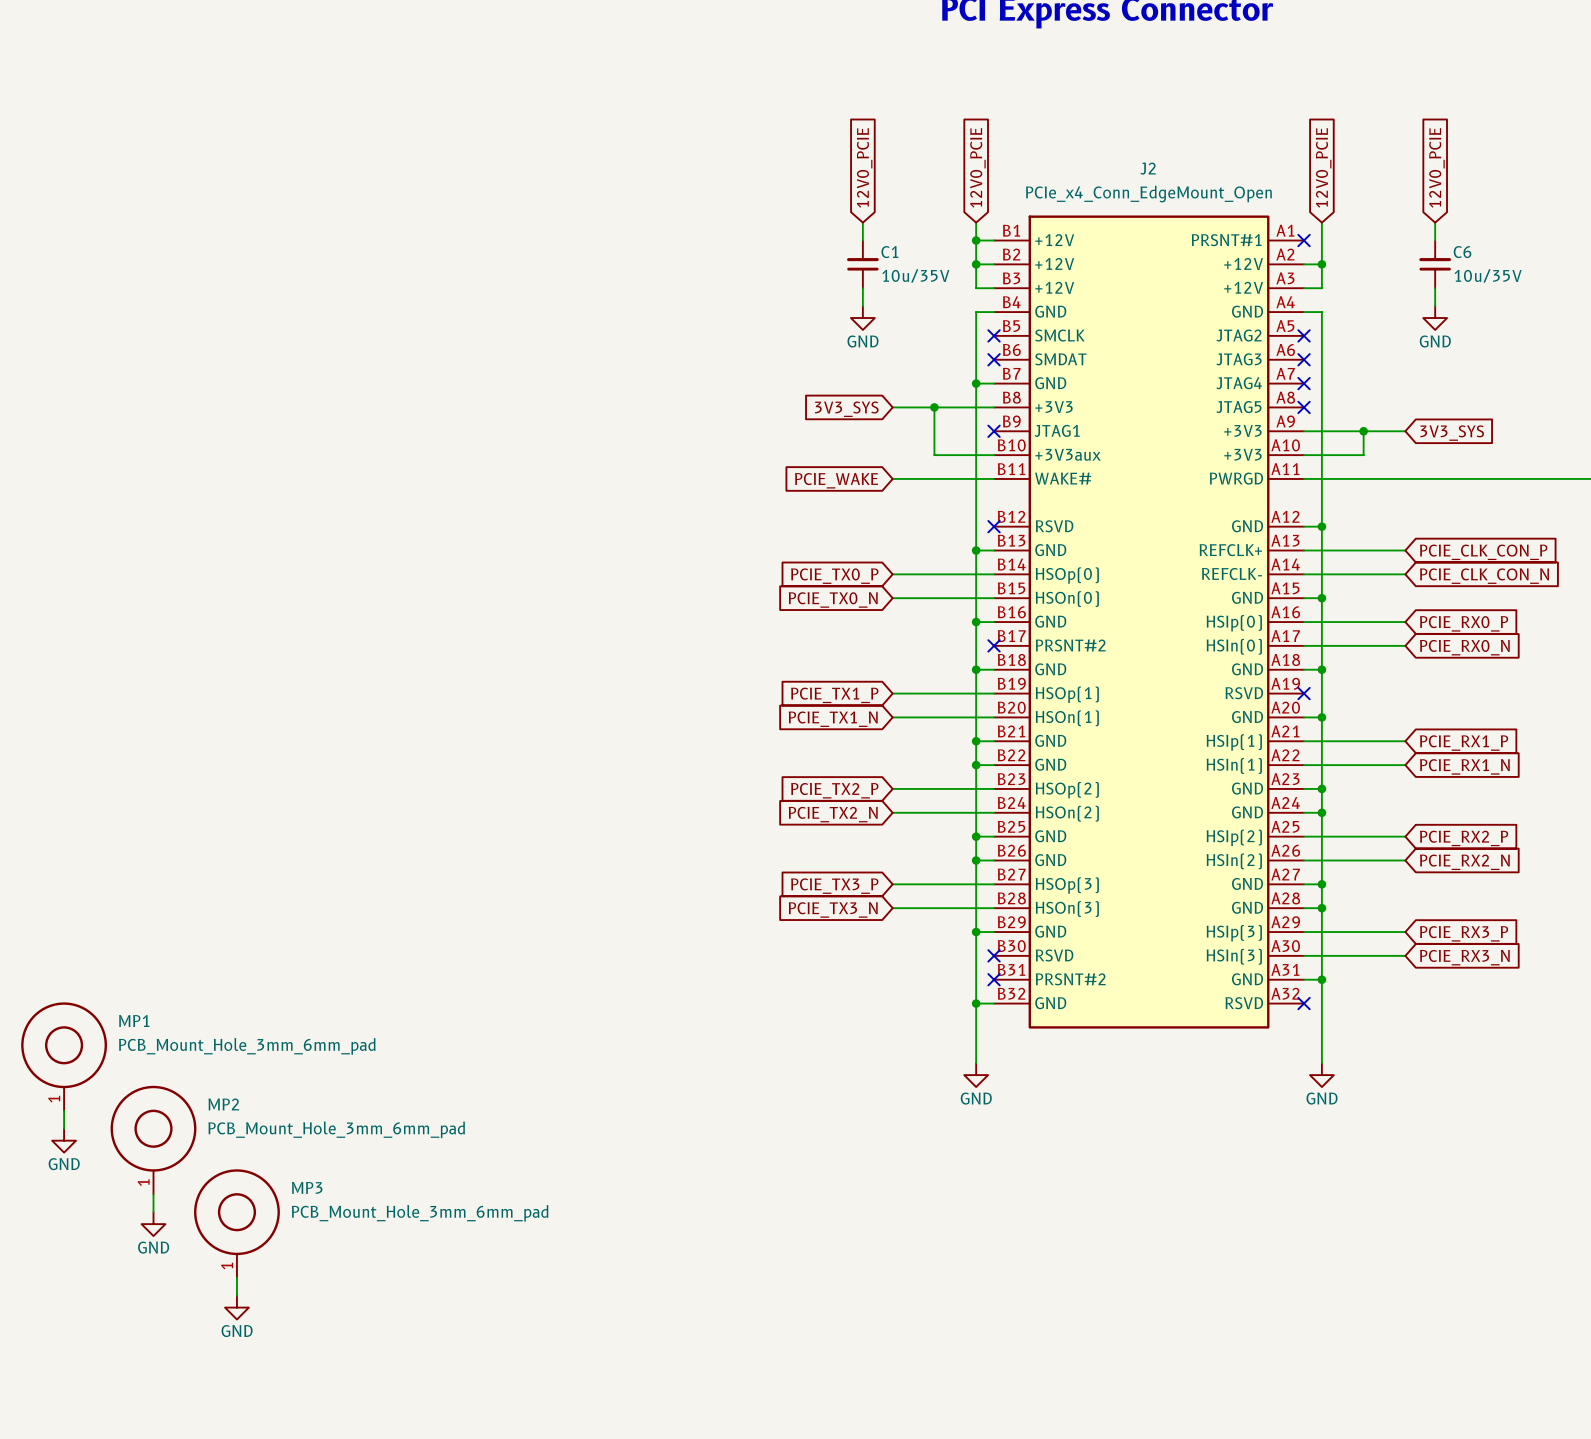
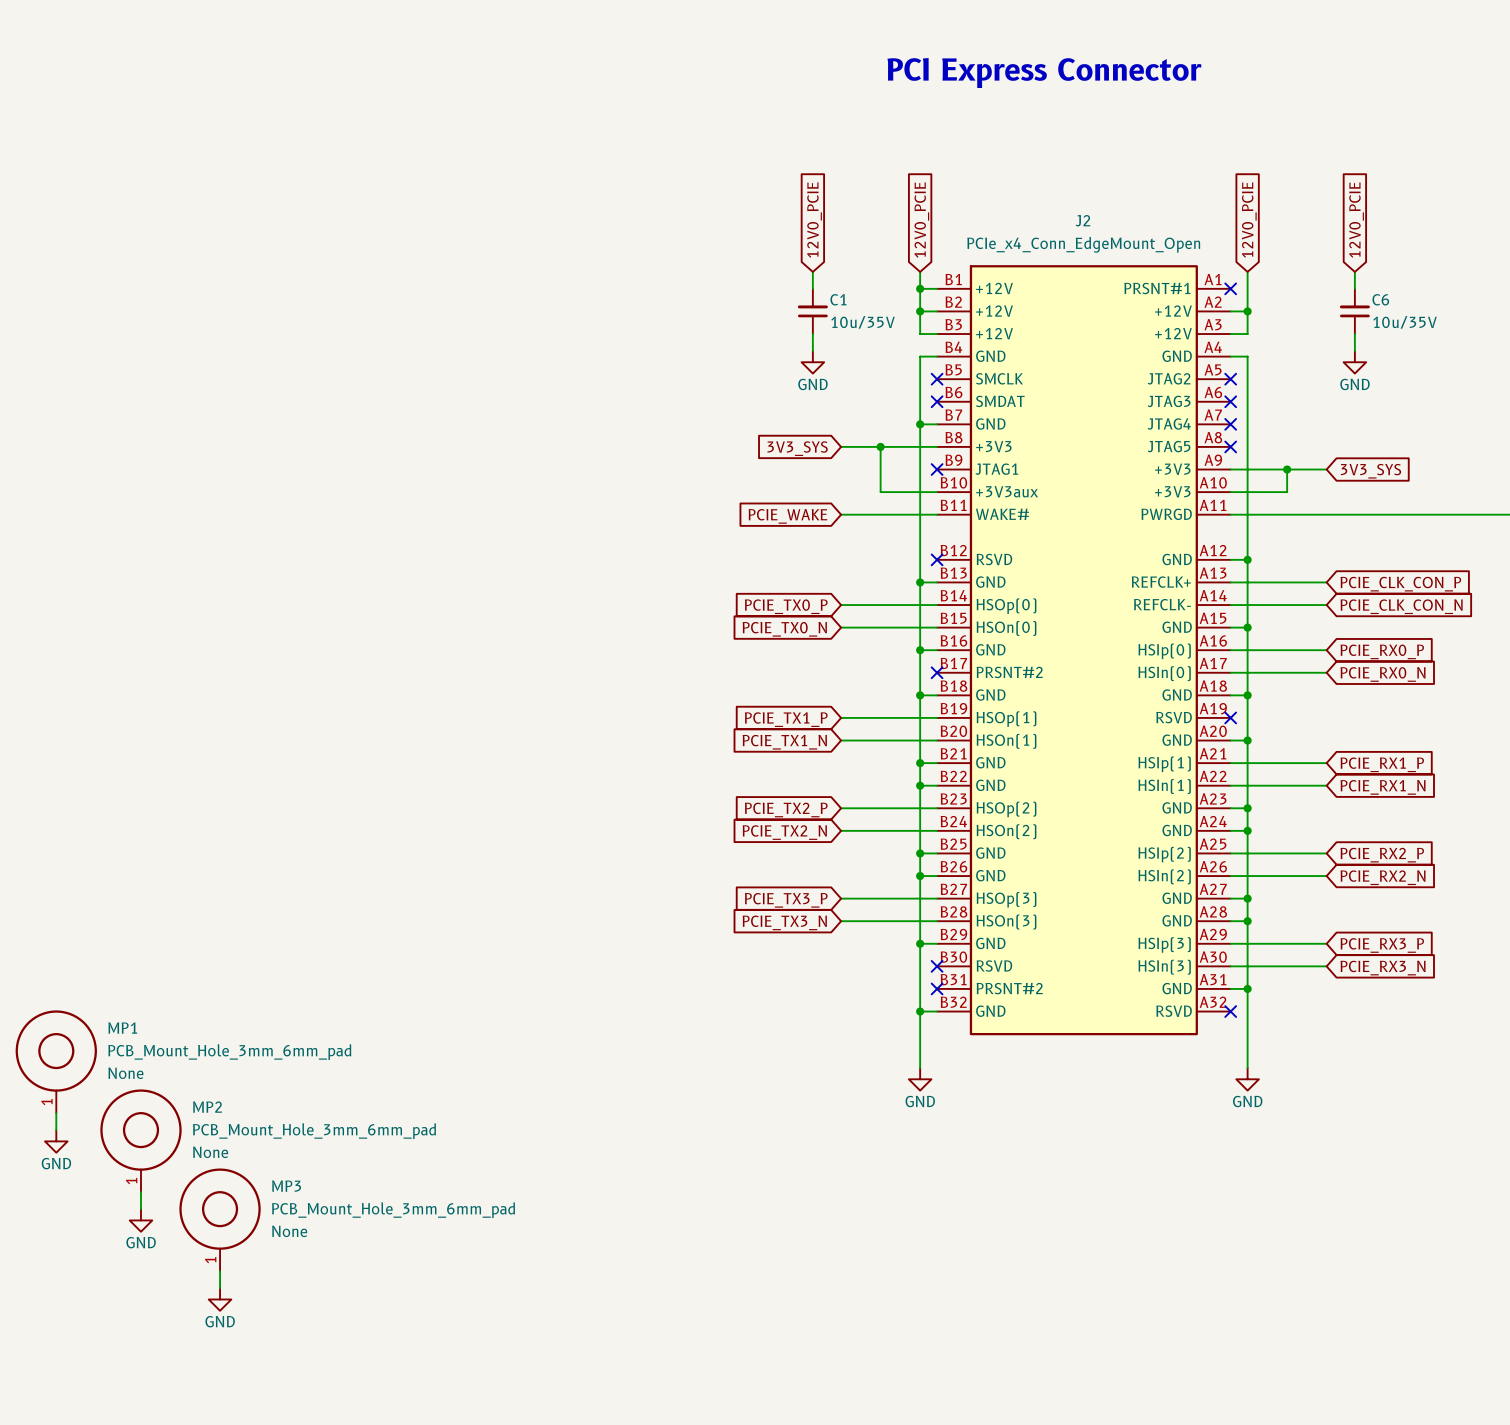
MP1 text: none -> None (125, 1073)
MP2 text: none -> None (210, 1152)
MP3 text: none -> None (289, 1231)

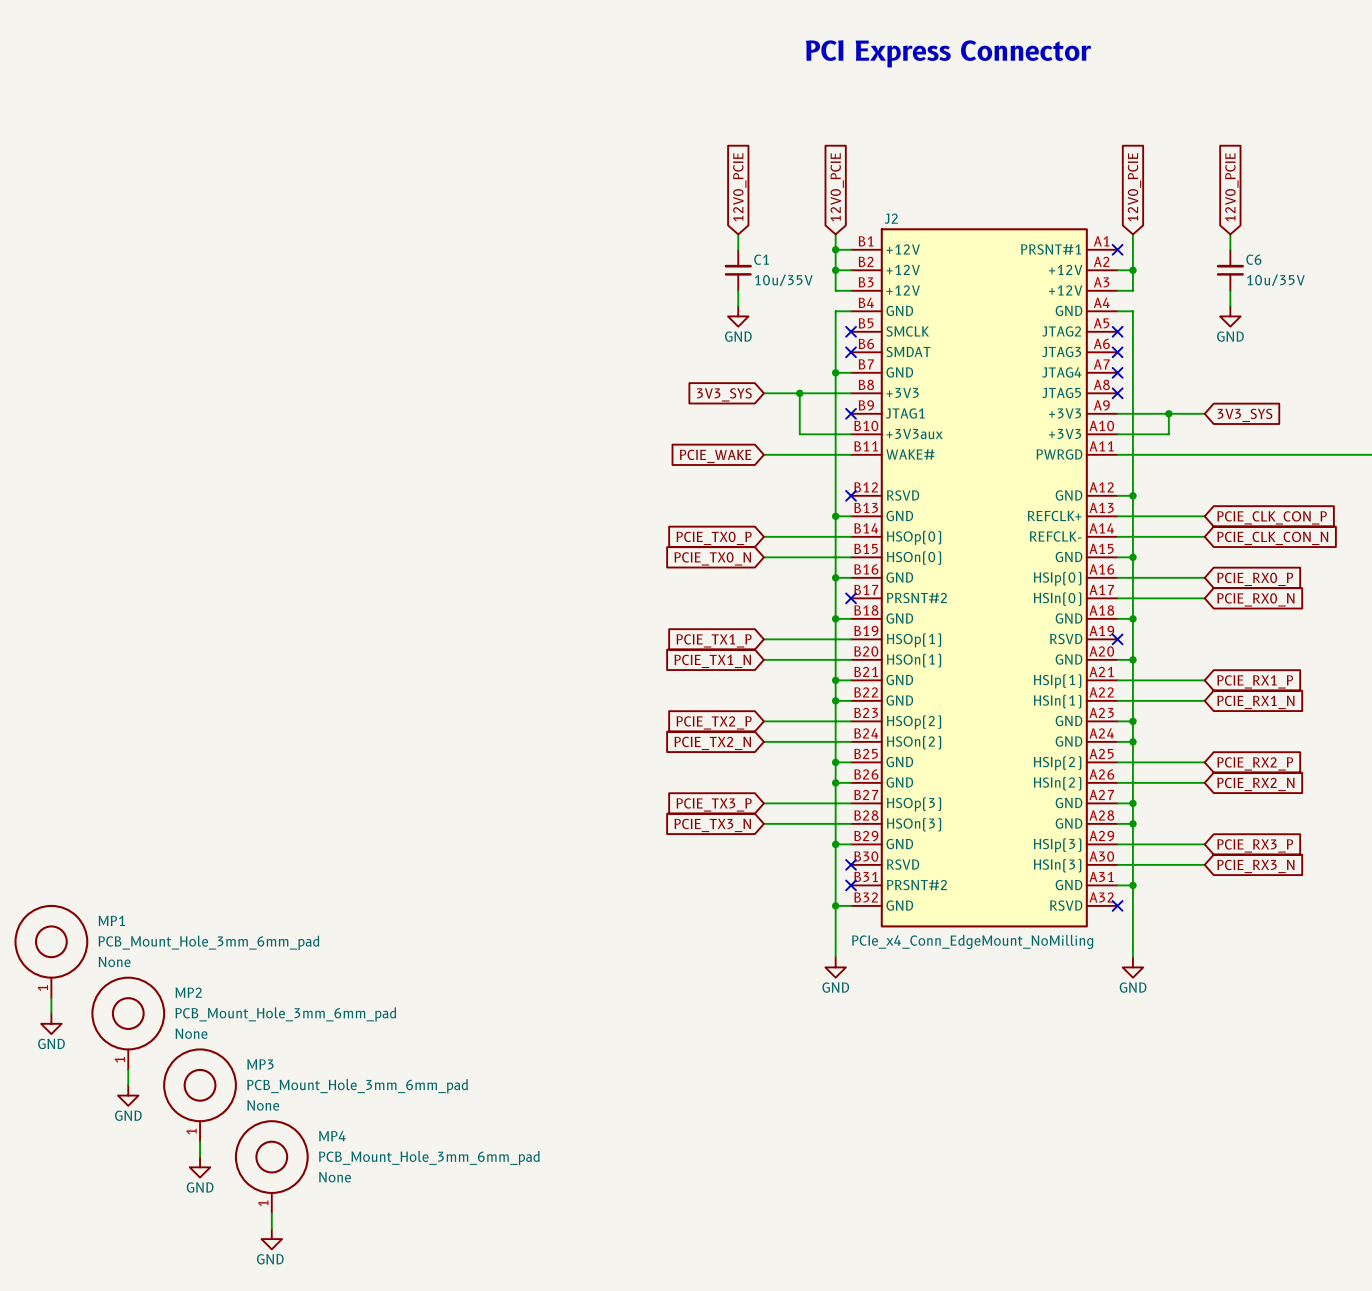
J2 name position: J2 (1082, 220) -> J2 (891, 218)
J2 value: PCIe_x4_Conn_EdgeMount_Open (1083, 244) -> PCIe_x4_Conn_EdgeMount_NoMilling (972, 941)
MP4: none -> PCB_Mount_Hole_3mm_6mm_pad (271, 1166)
wire: none -> (271, 1213) (271, 1228)
power symbol: none -> GND (271, 1239)

